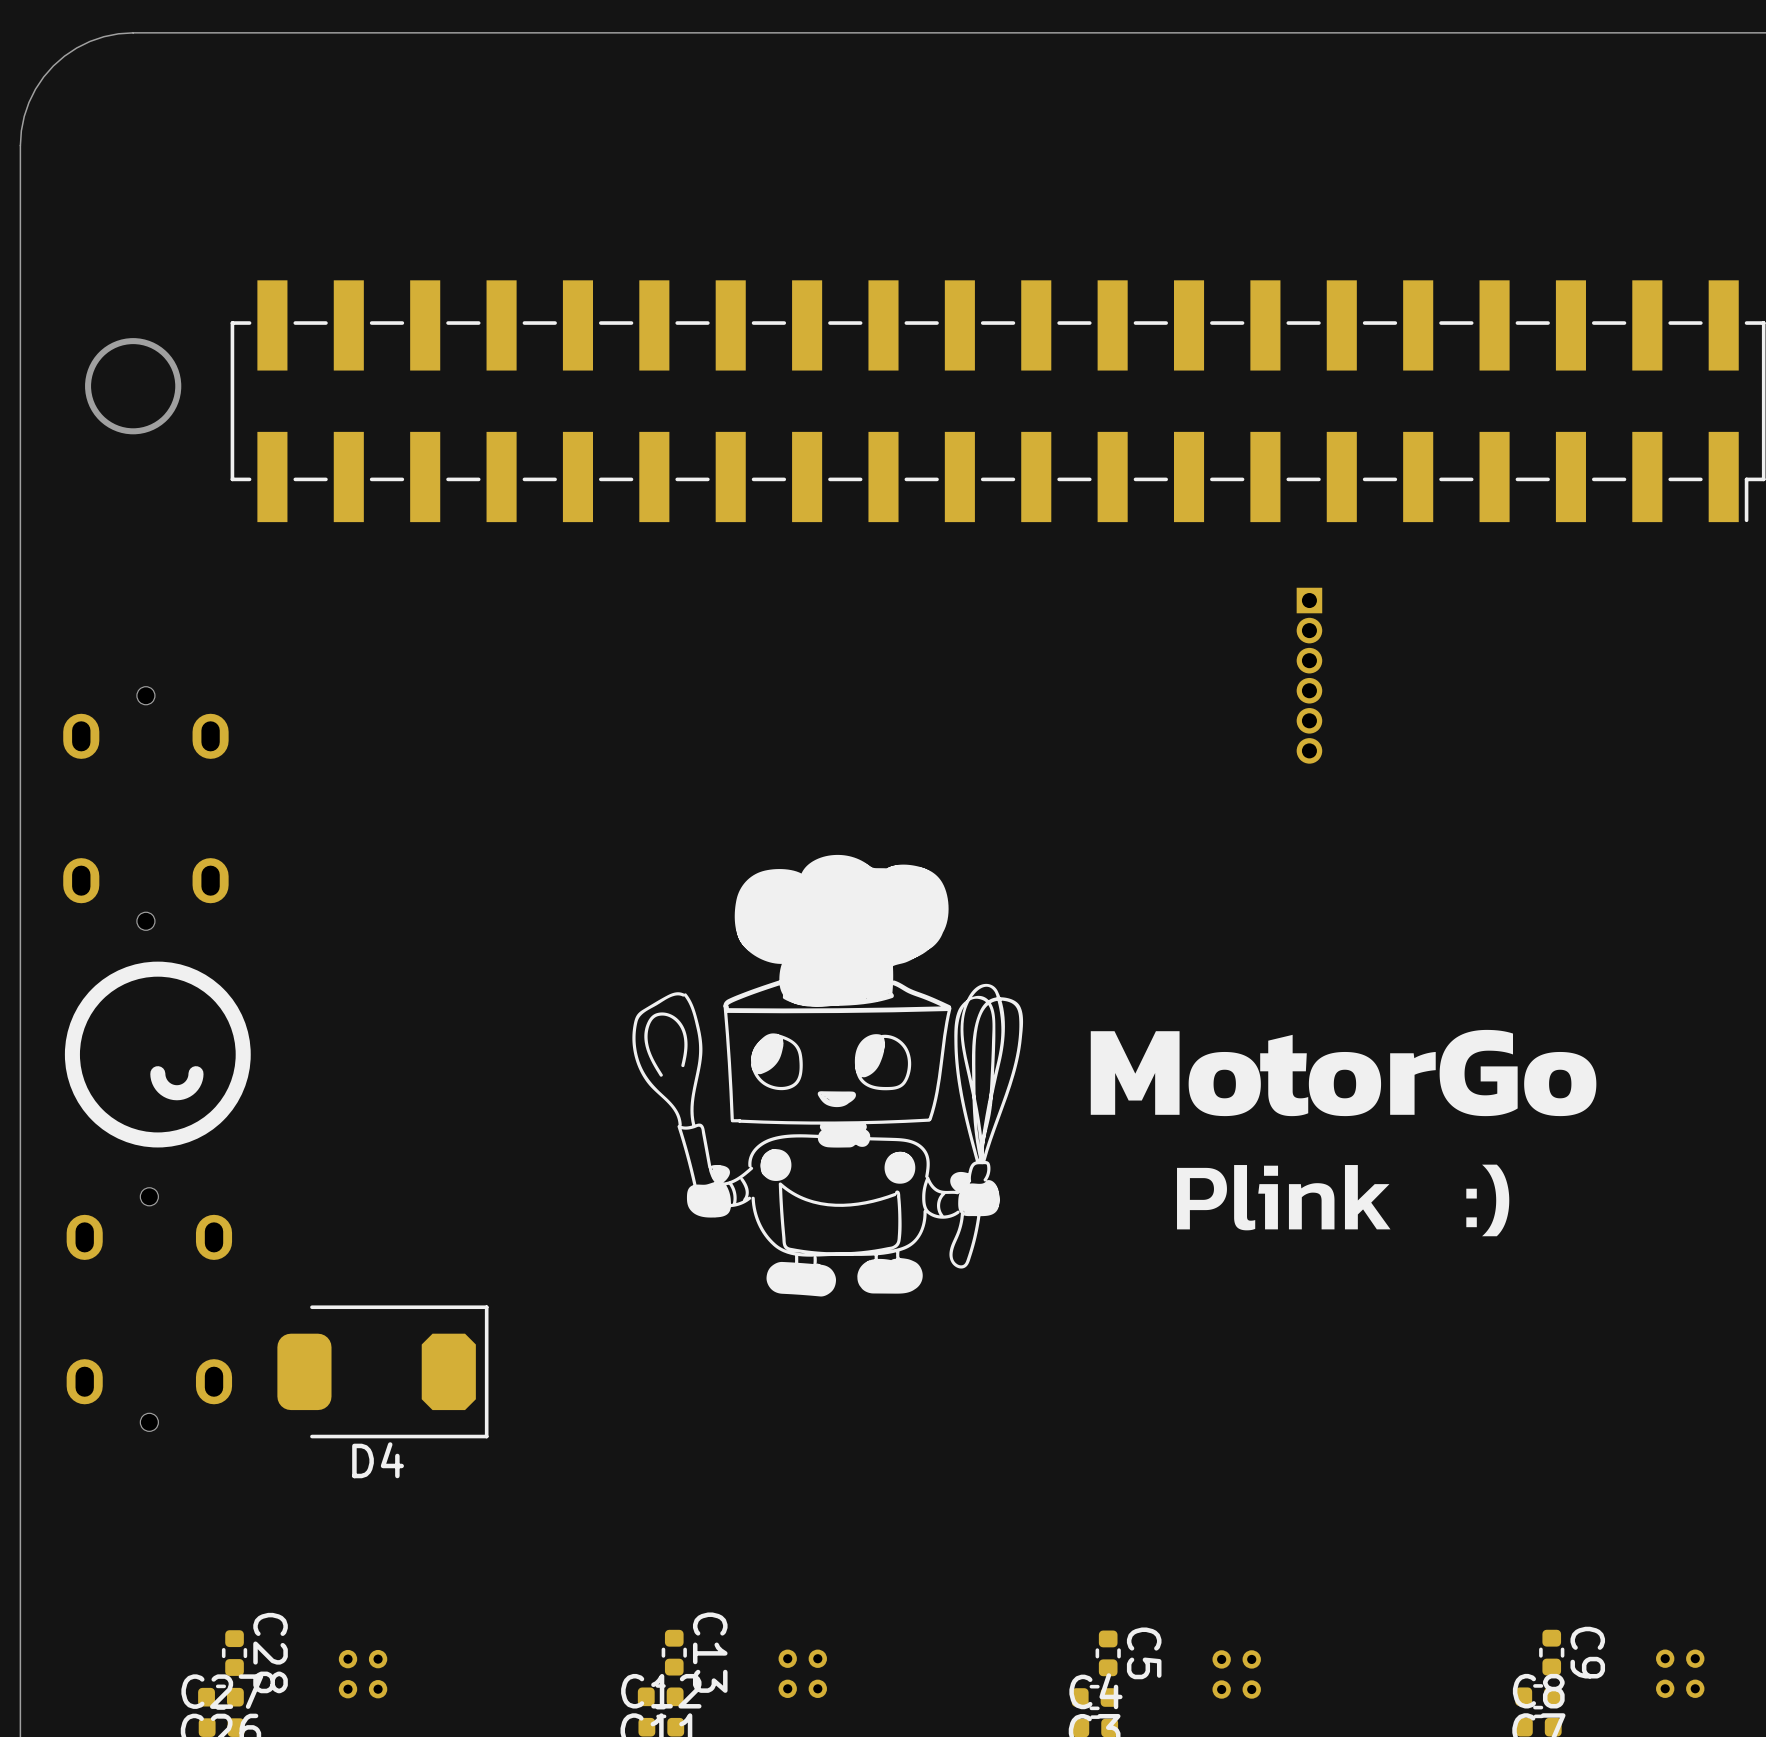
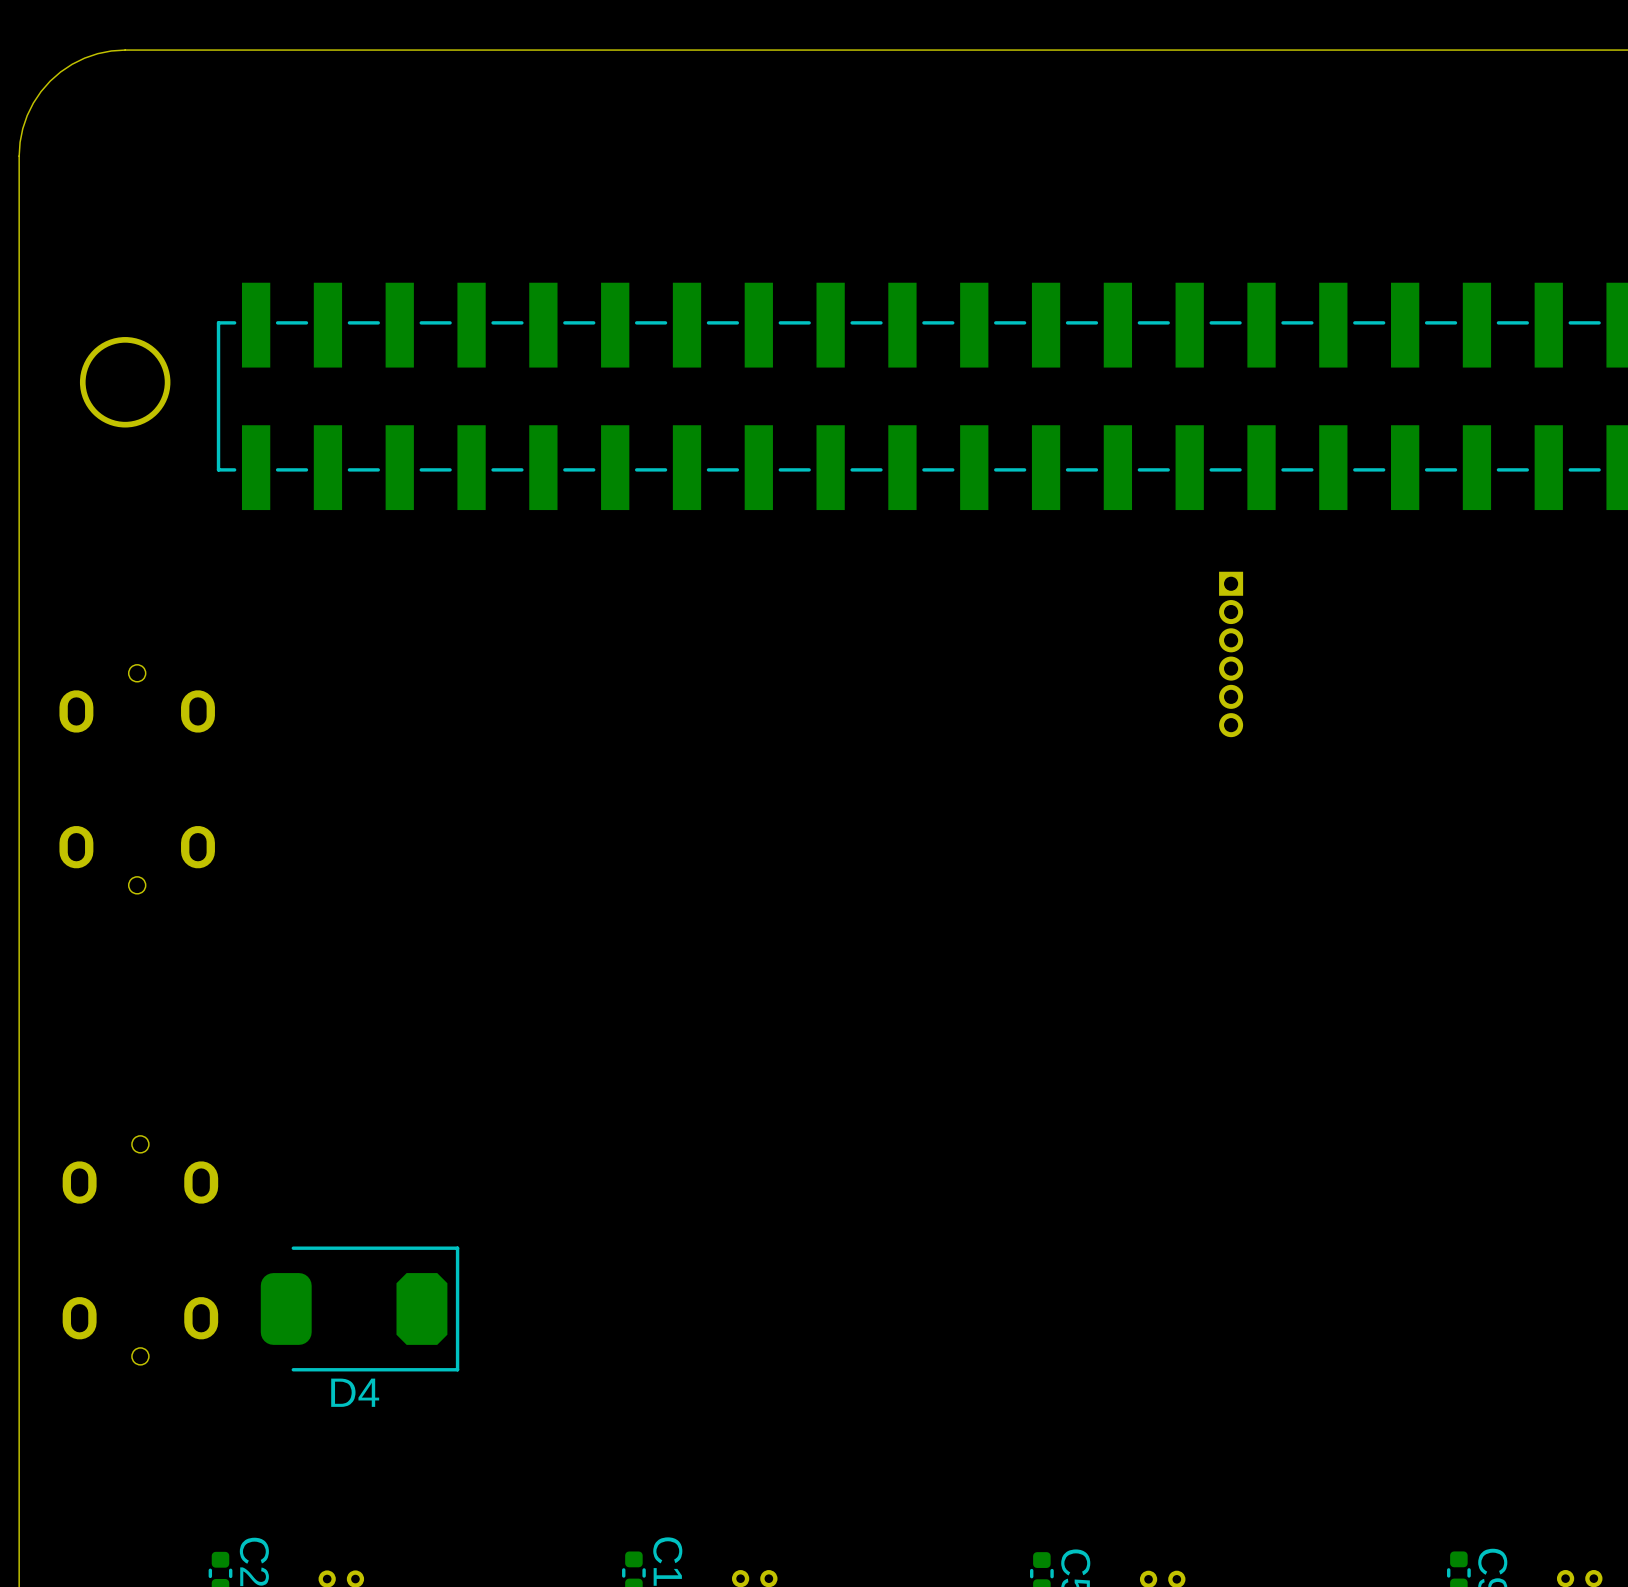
drawing: [632, 854, 1024, 1297] -> none
drawing: [64, 961, 251, 1148] -> none
drawing: [1090, 1029, 1597, 1117] -> none
line: (196, 1073) (190, 1087) (176, 1092) (163, 1087) (157, 1073) -> none
drawing: [1466, 1164, 1510, 1237] -> none
drawing: [1177, 1165, 1391, 1231] -> none

